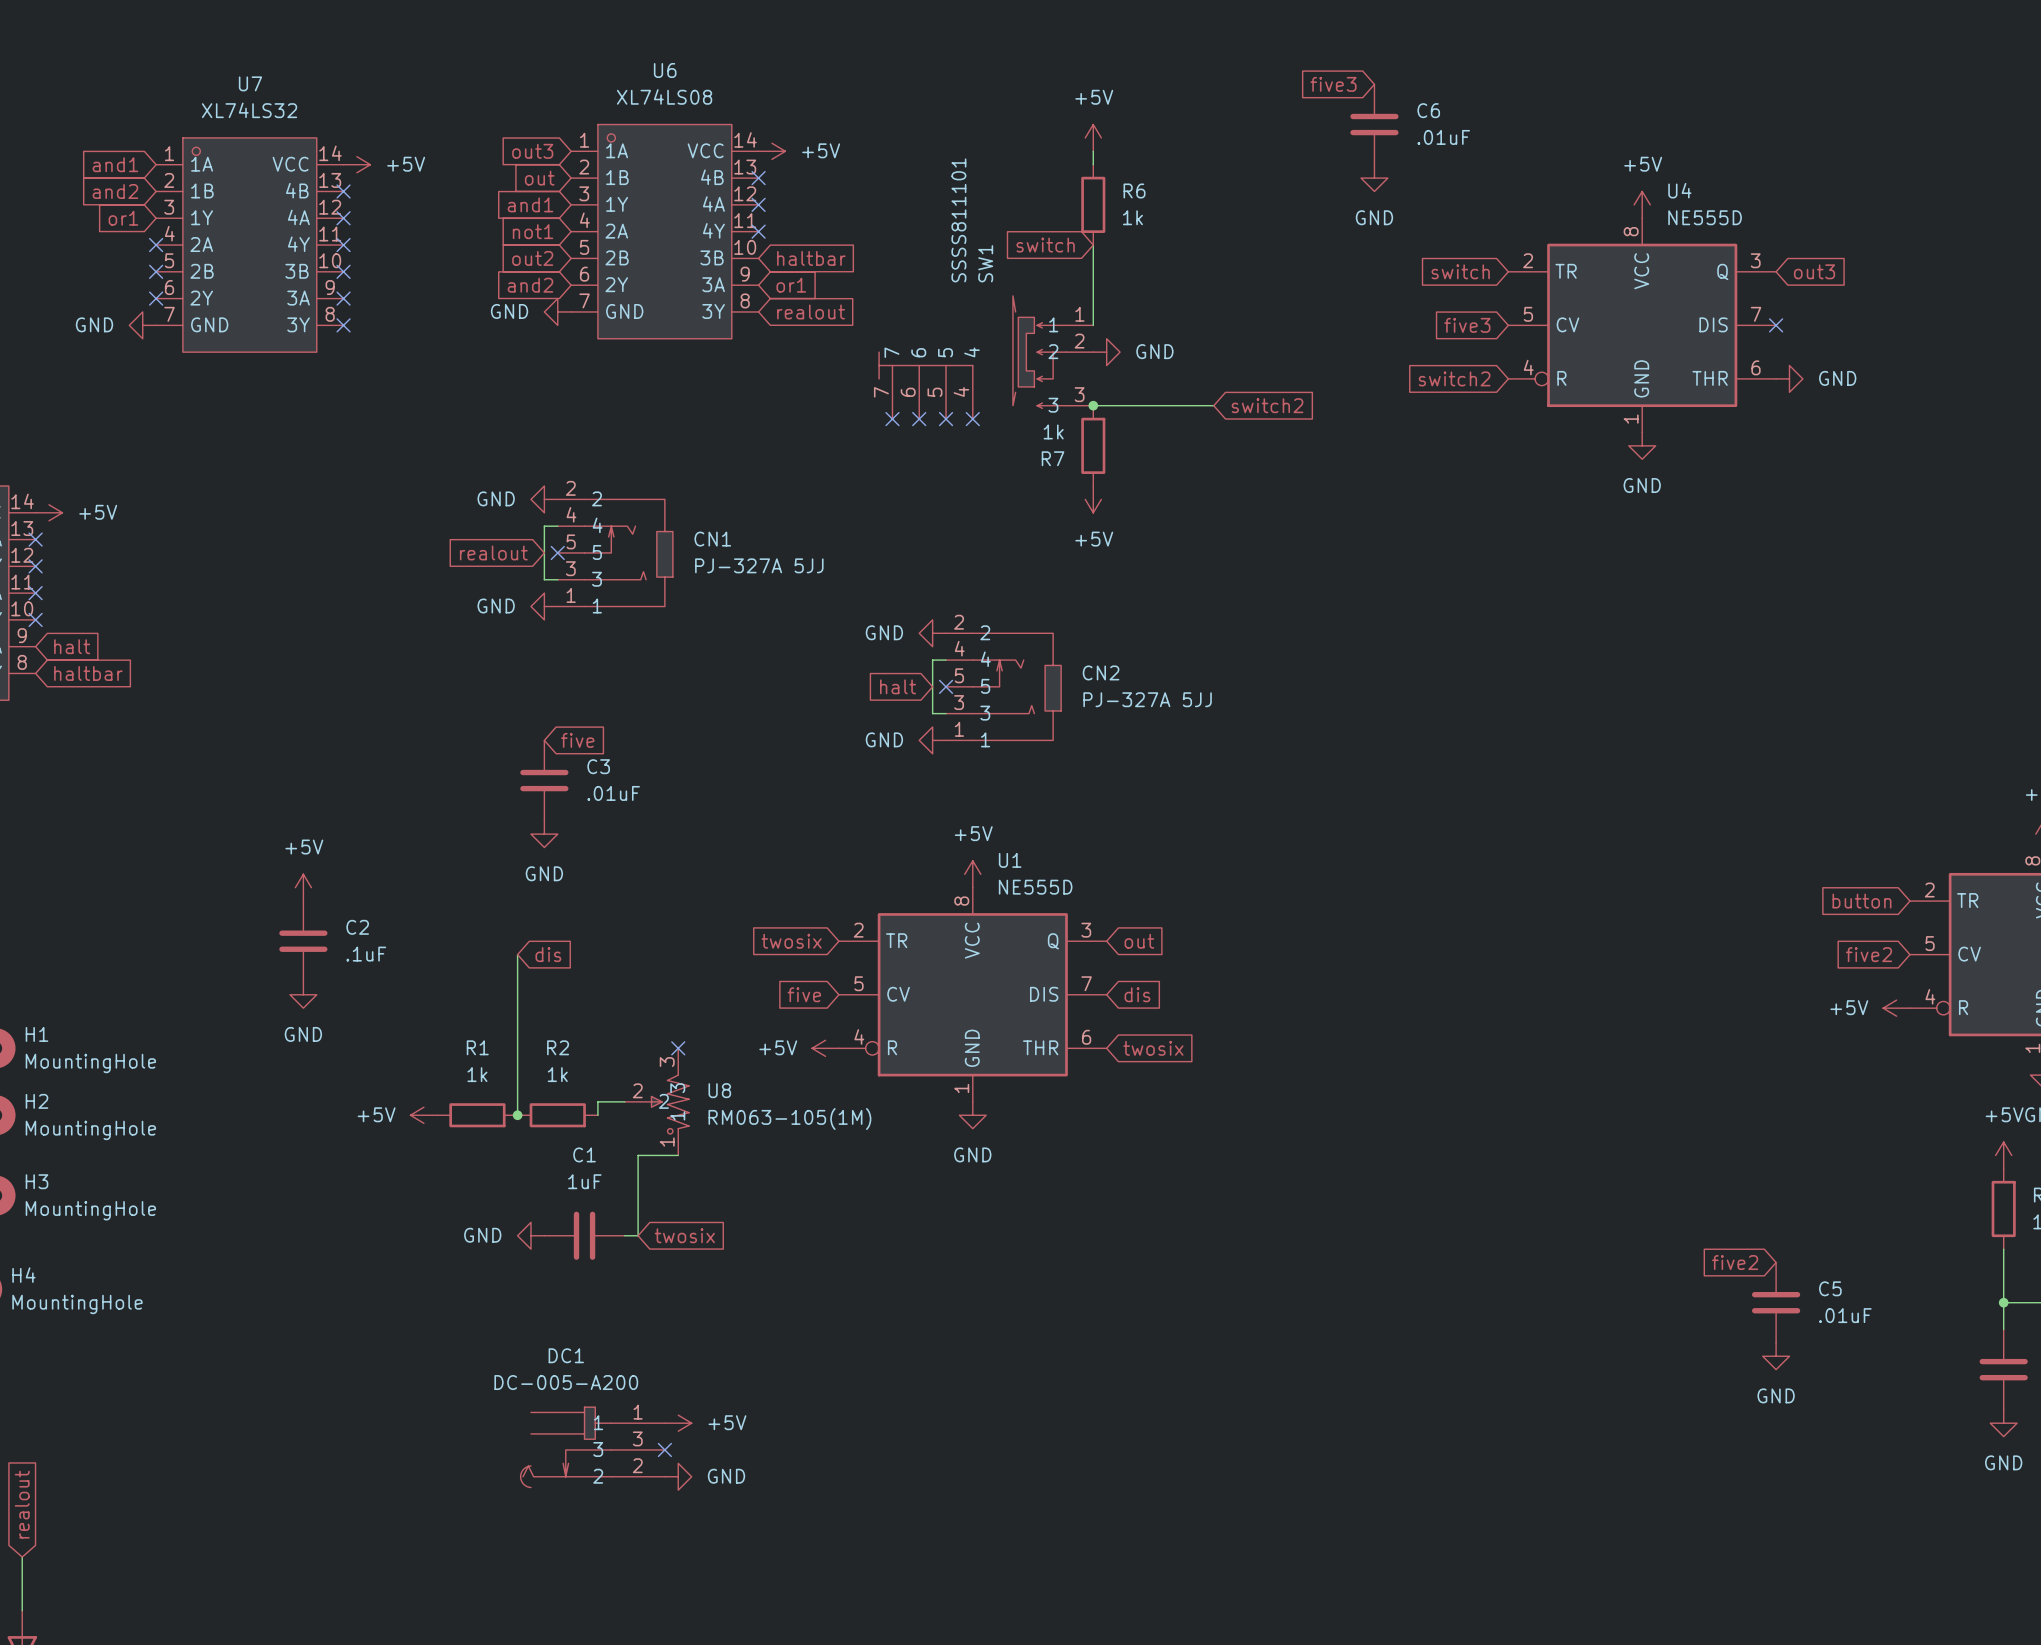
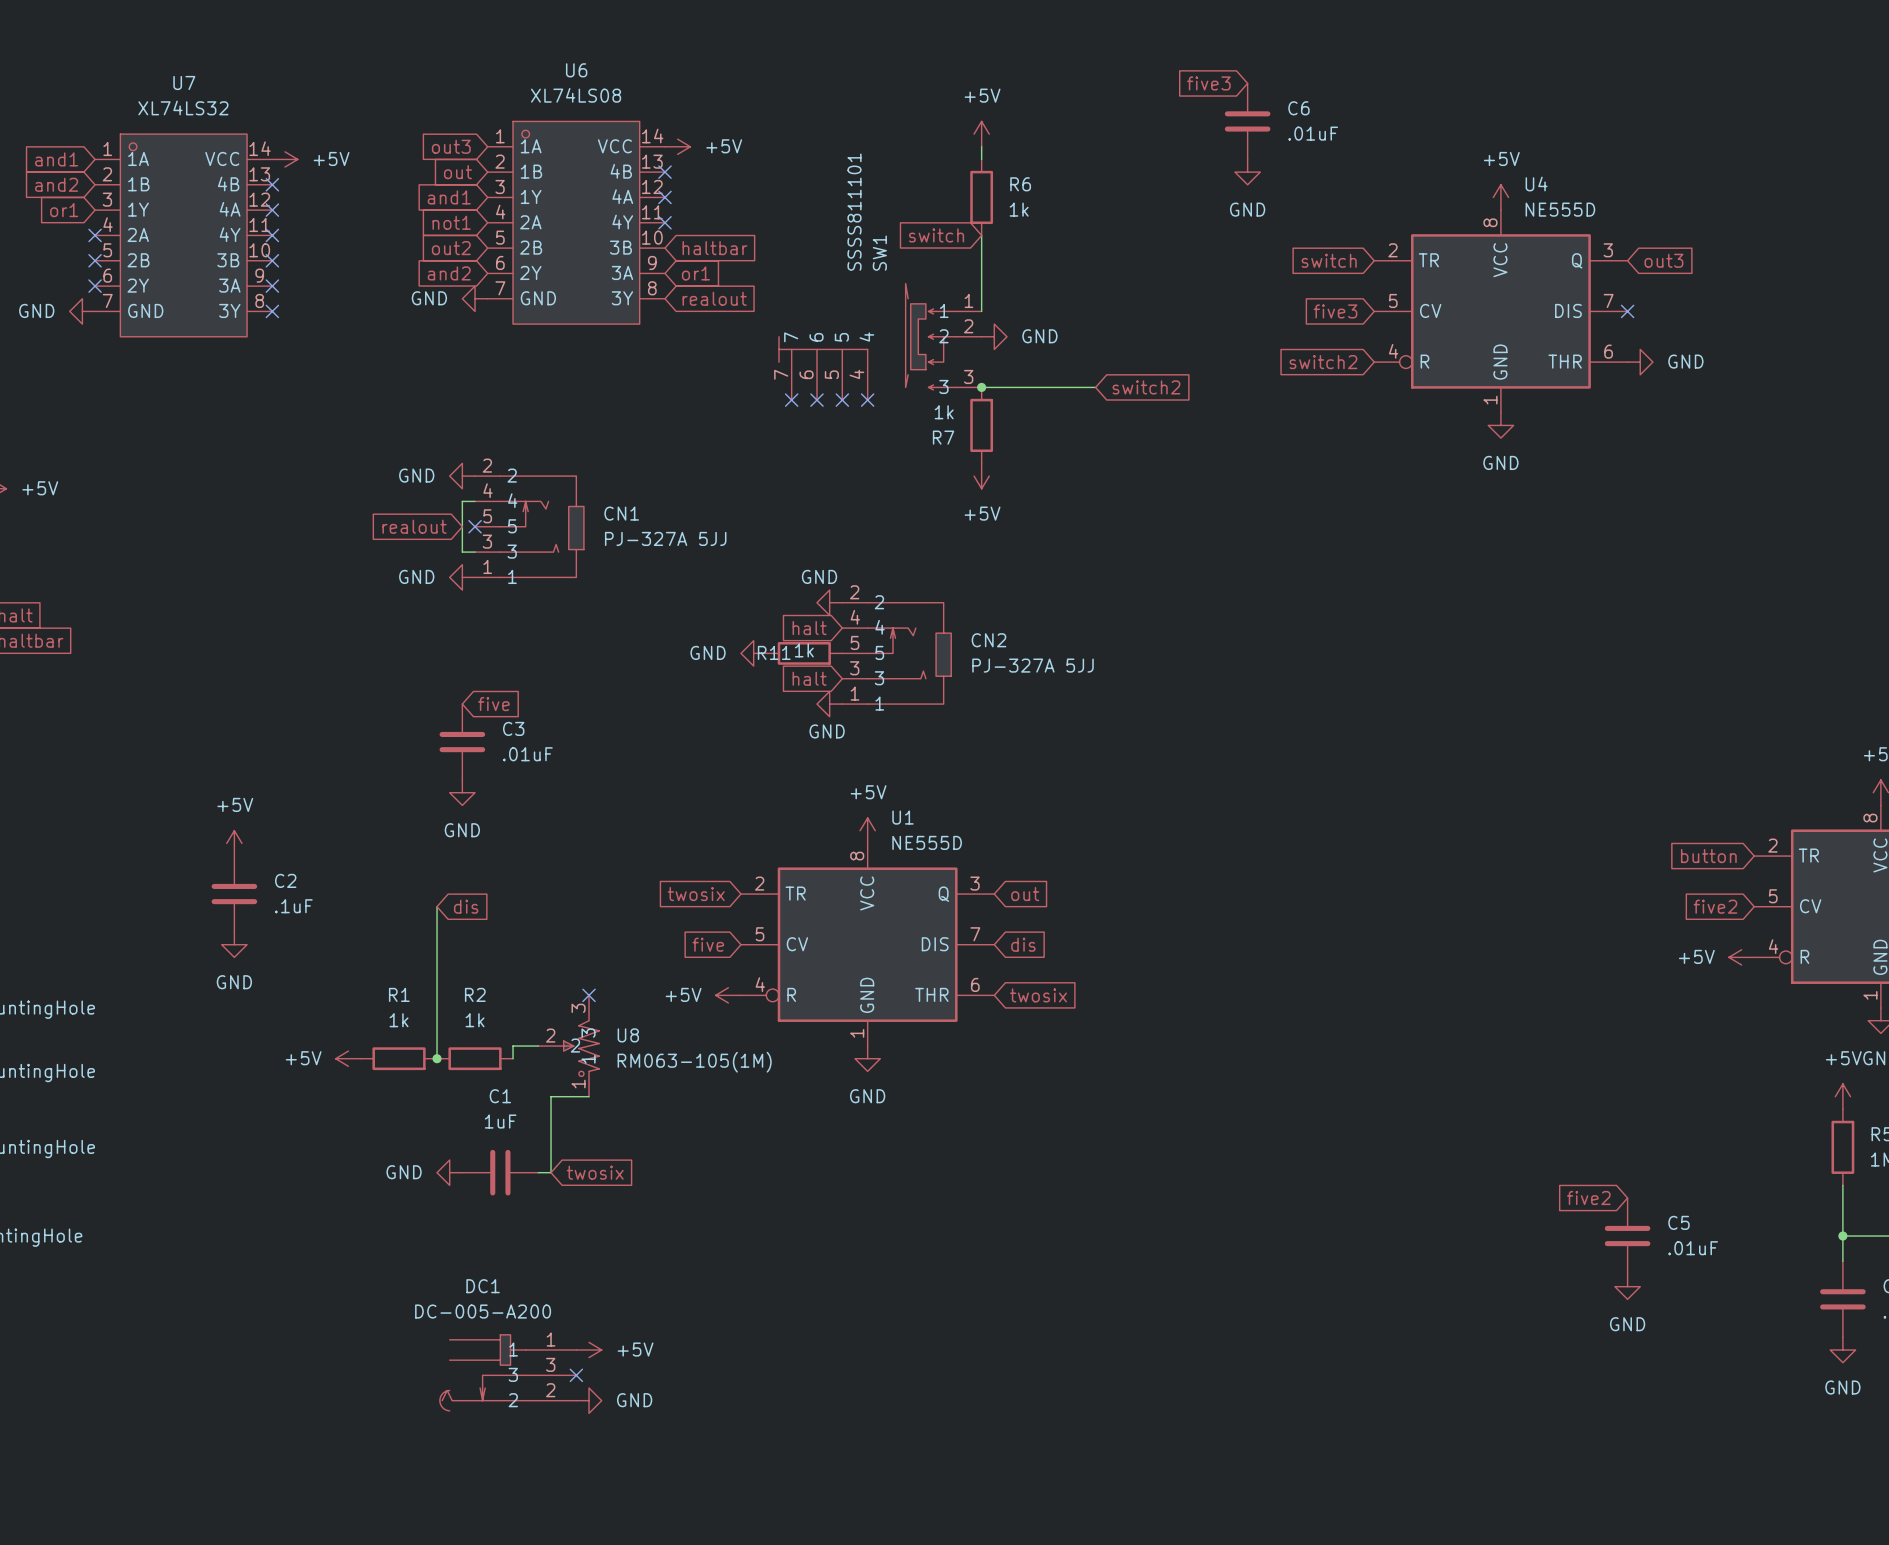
power symbol text position: GND (884, 632) -> GND (819, 576)
global label: none -> halt (809, 628)
wire: (946, 660) (932, 660) (932, 713) (946, 713) -> none
power symbol: none -> GND (753, 653)
global label: halt (898, 686) -> none
R11: none -> 1k (804, 653)
no-connect mark: (946, 686) -> none
global label: none -> halt (809, 678)
power symbol text position: GND (884, 739) -> GND (827, 731)

